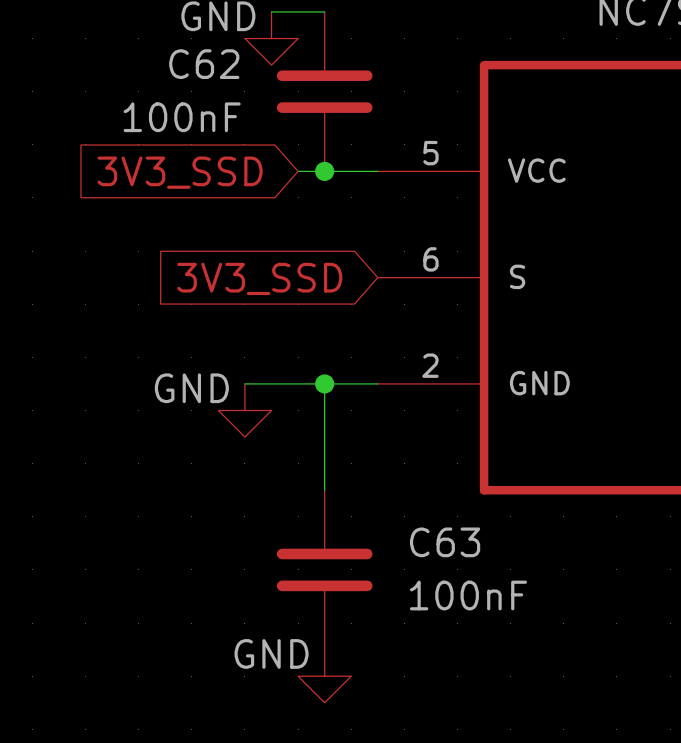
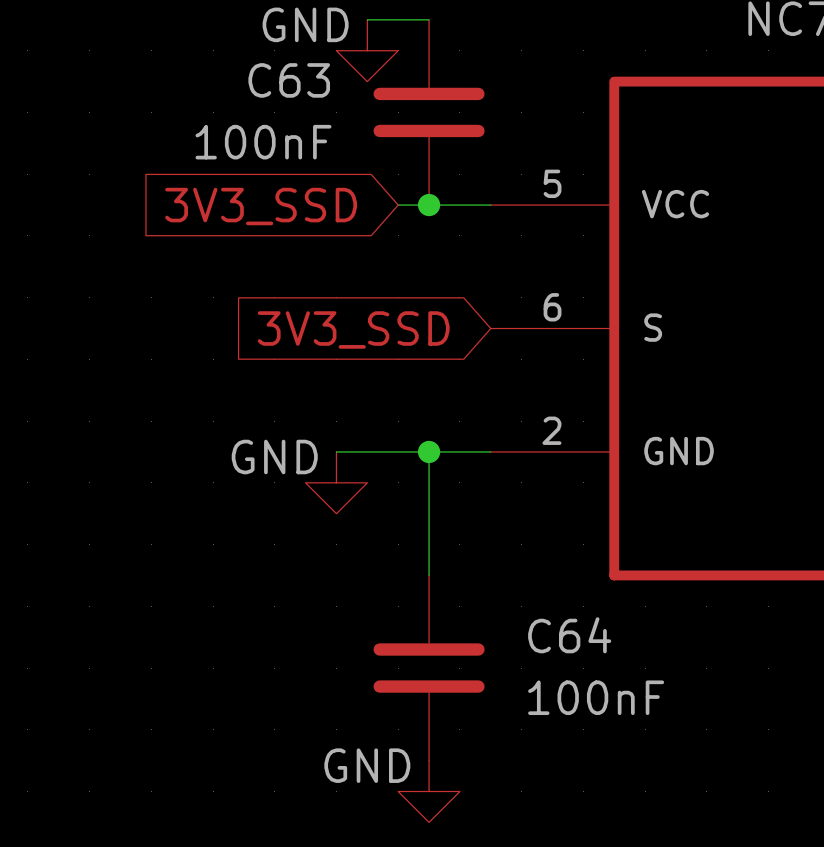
C62 name: C62 (204, 64) -> C63 (289, 80)
C63 name: C63 (445, 542) -> C64 (569, 635)

